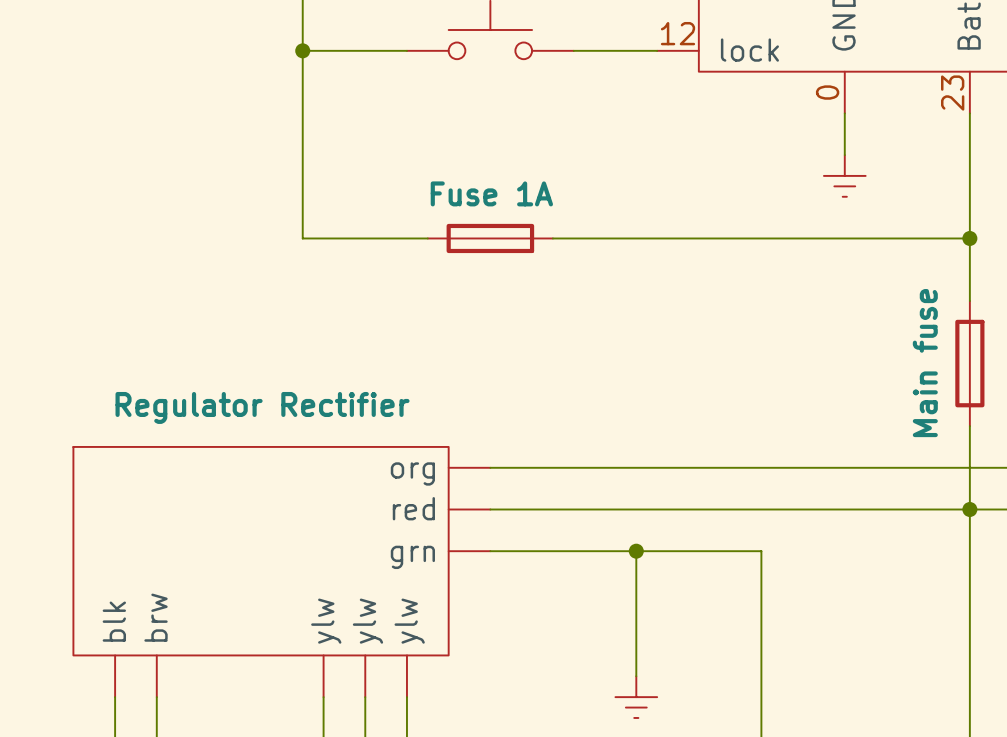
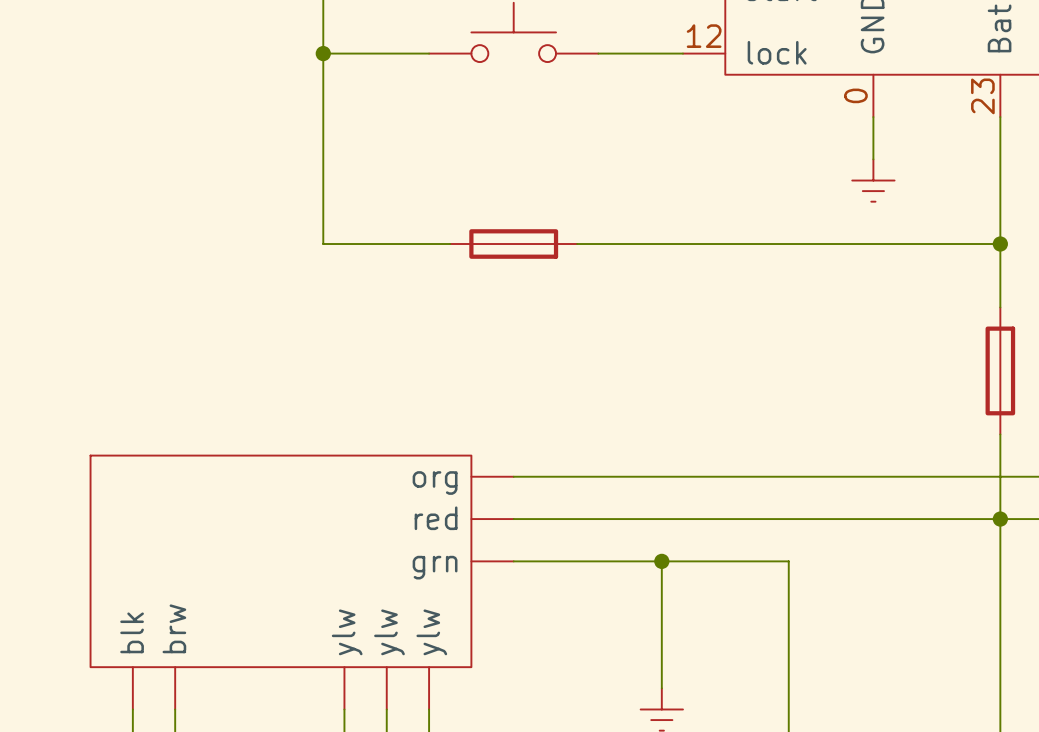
part value: Fuse 1A (491, 193) -> none
part value: Main fuse (925, 363) -> none
part value: Regulator Rectifier (262, 407) -> none

